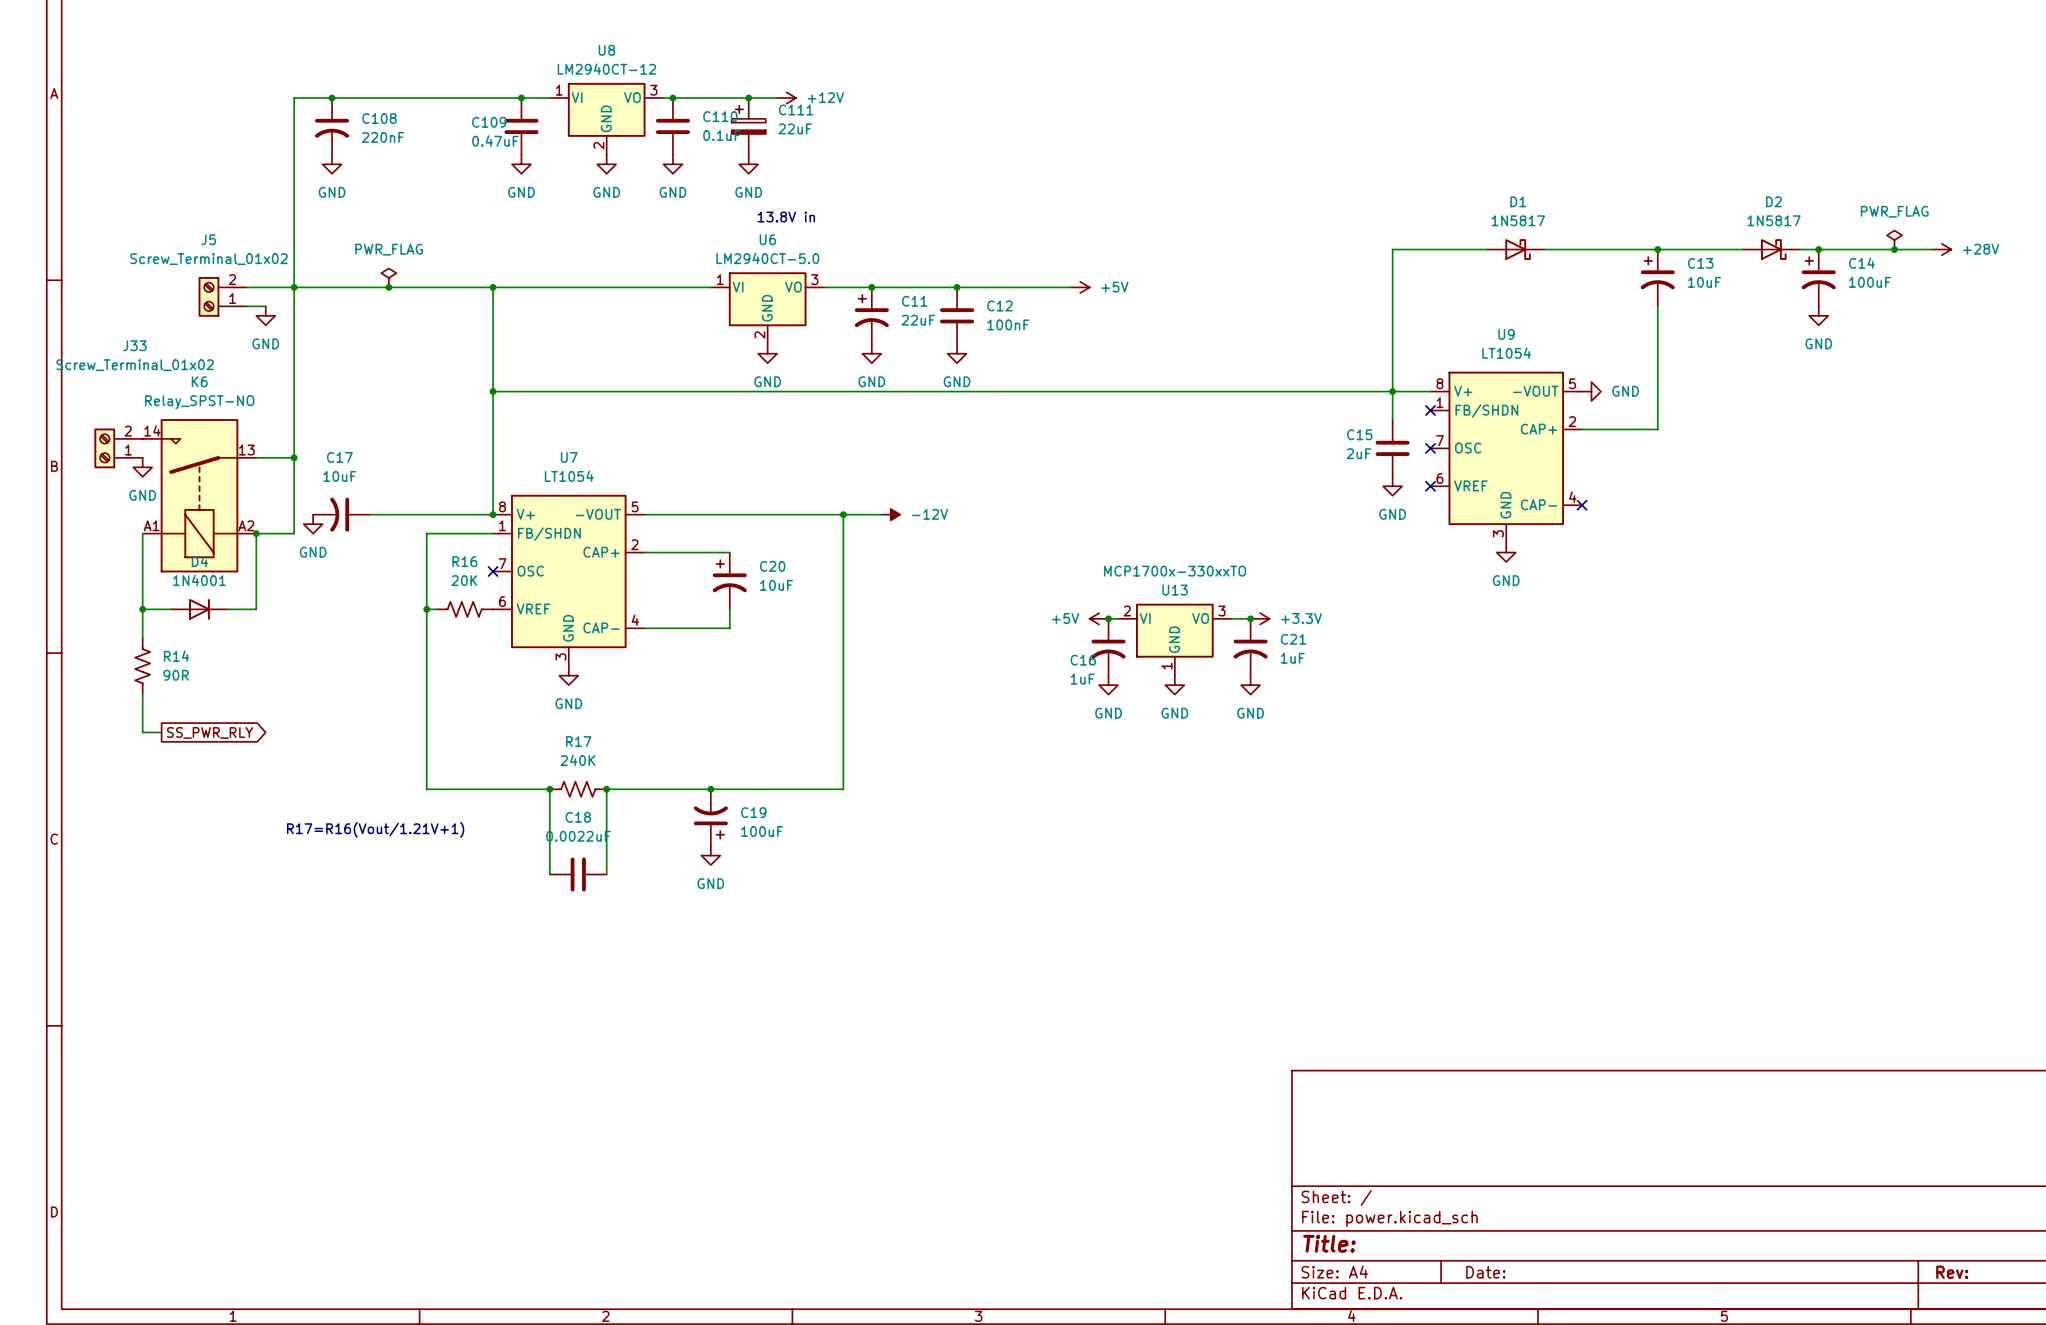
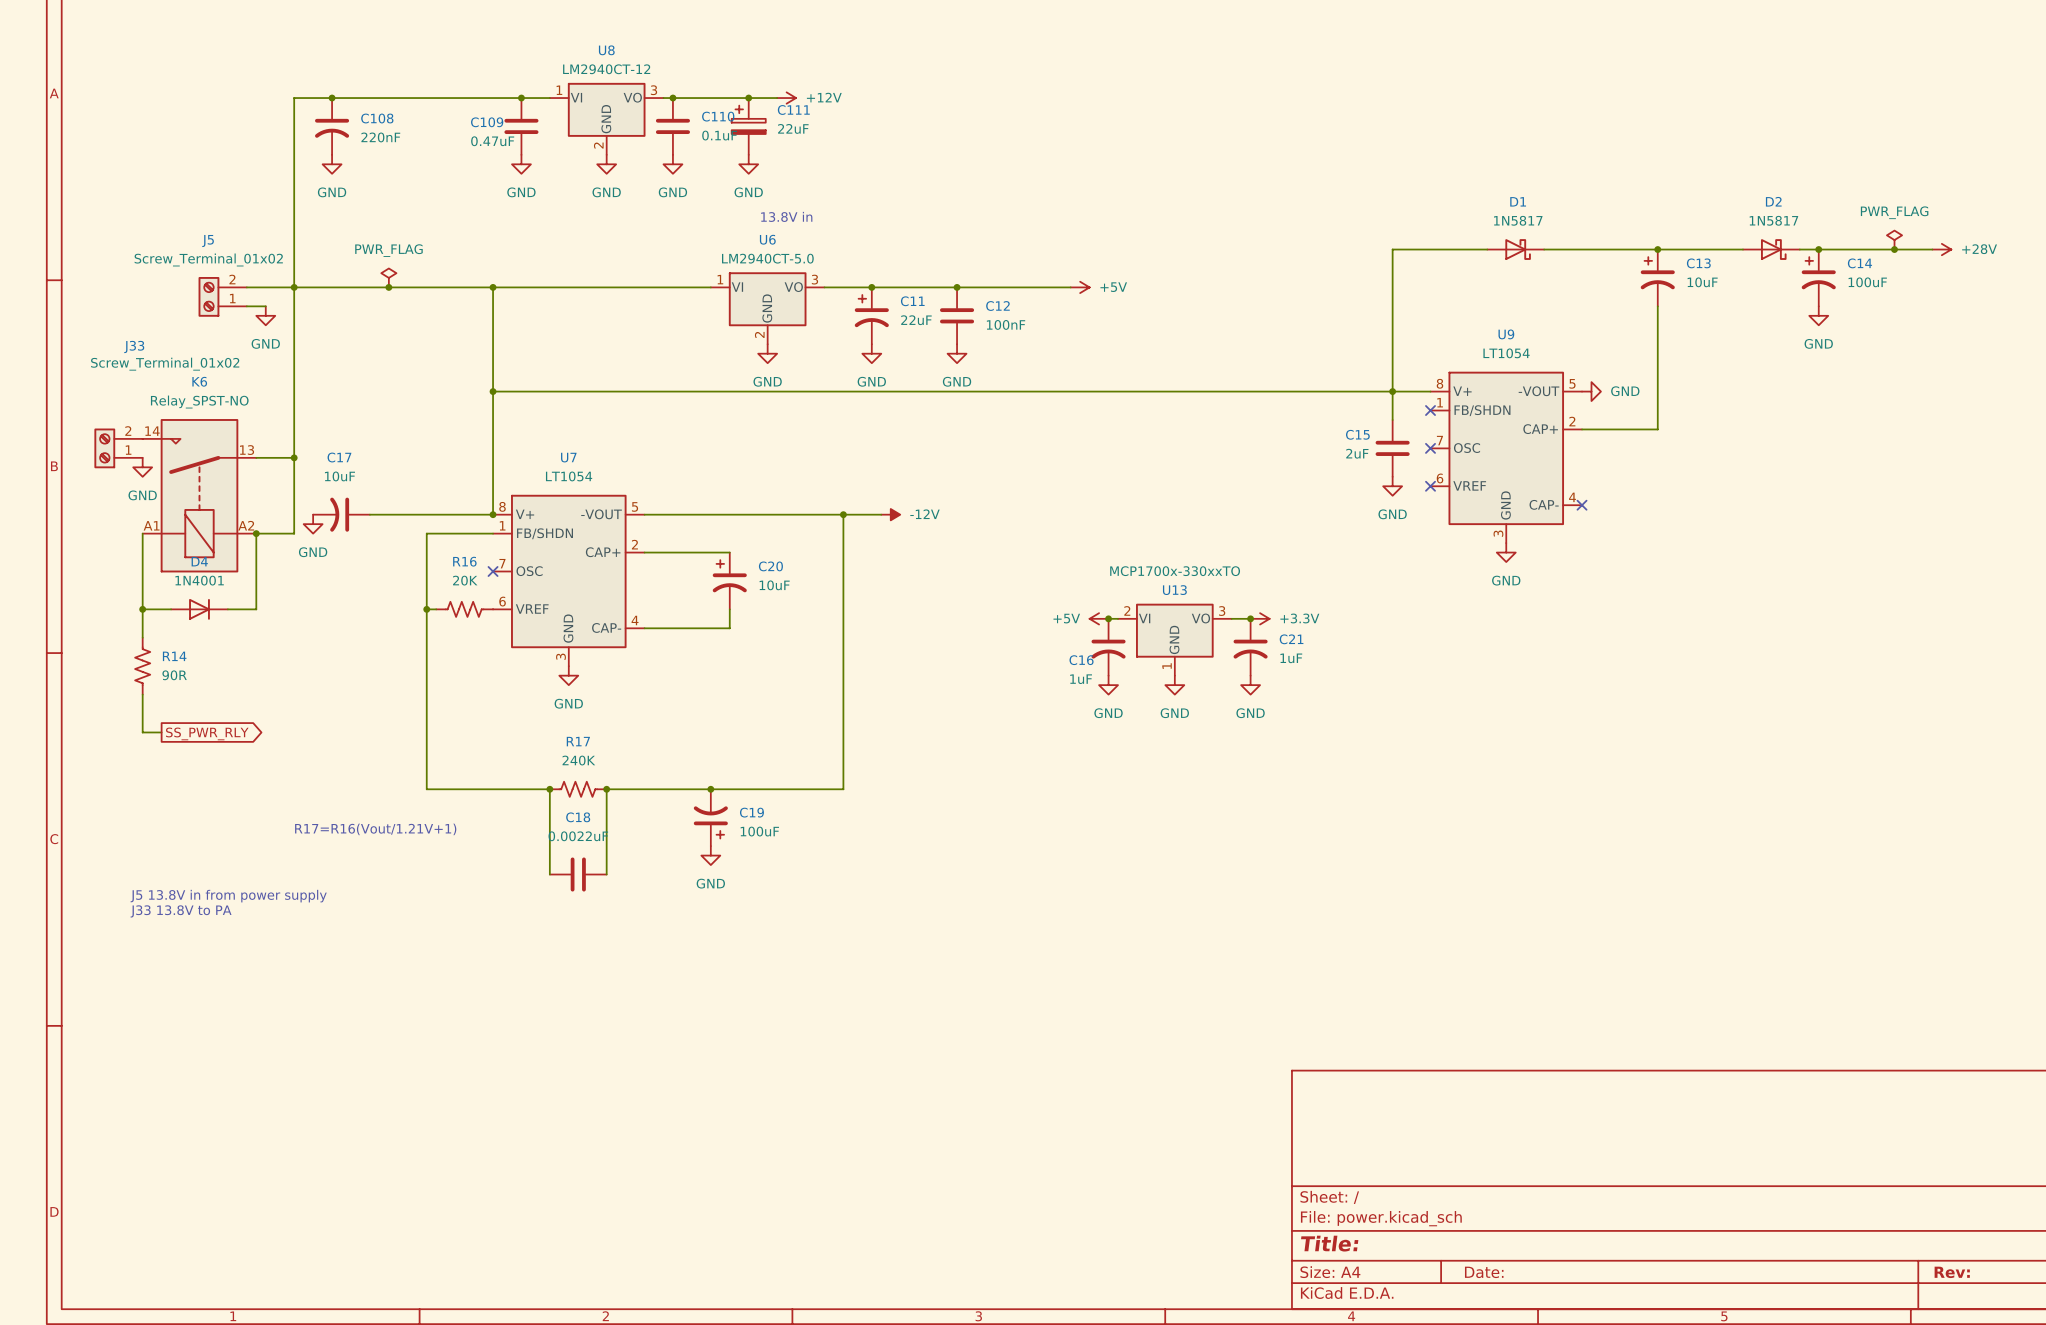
J33 value position: Screw_Terminal_01x02 (135, 365) -> Screw_Terminal_01x02 (165, 364)
text: none -> J5 13.8V in from power supply (228, 896)
text: none -> J33 13.8V to PA (181, 911)

